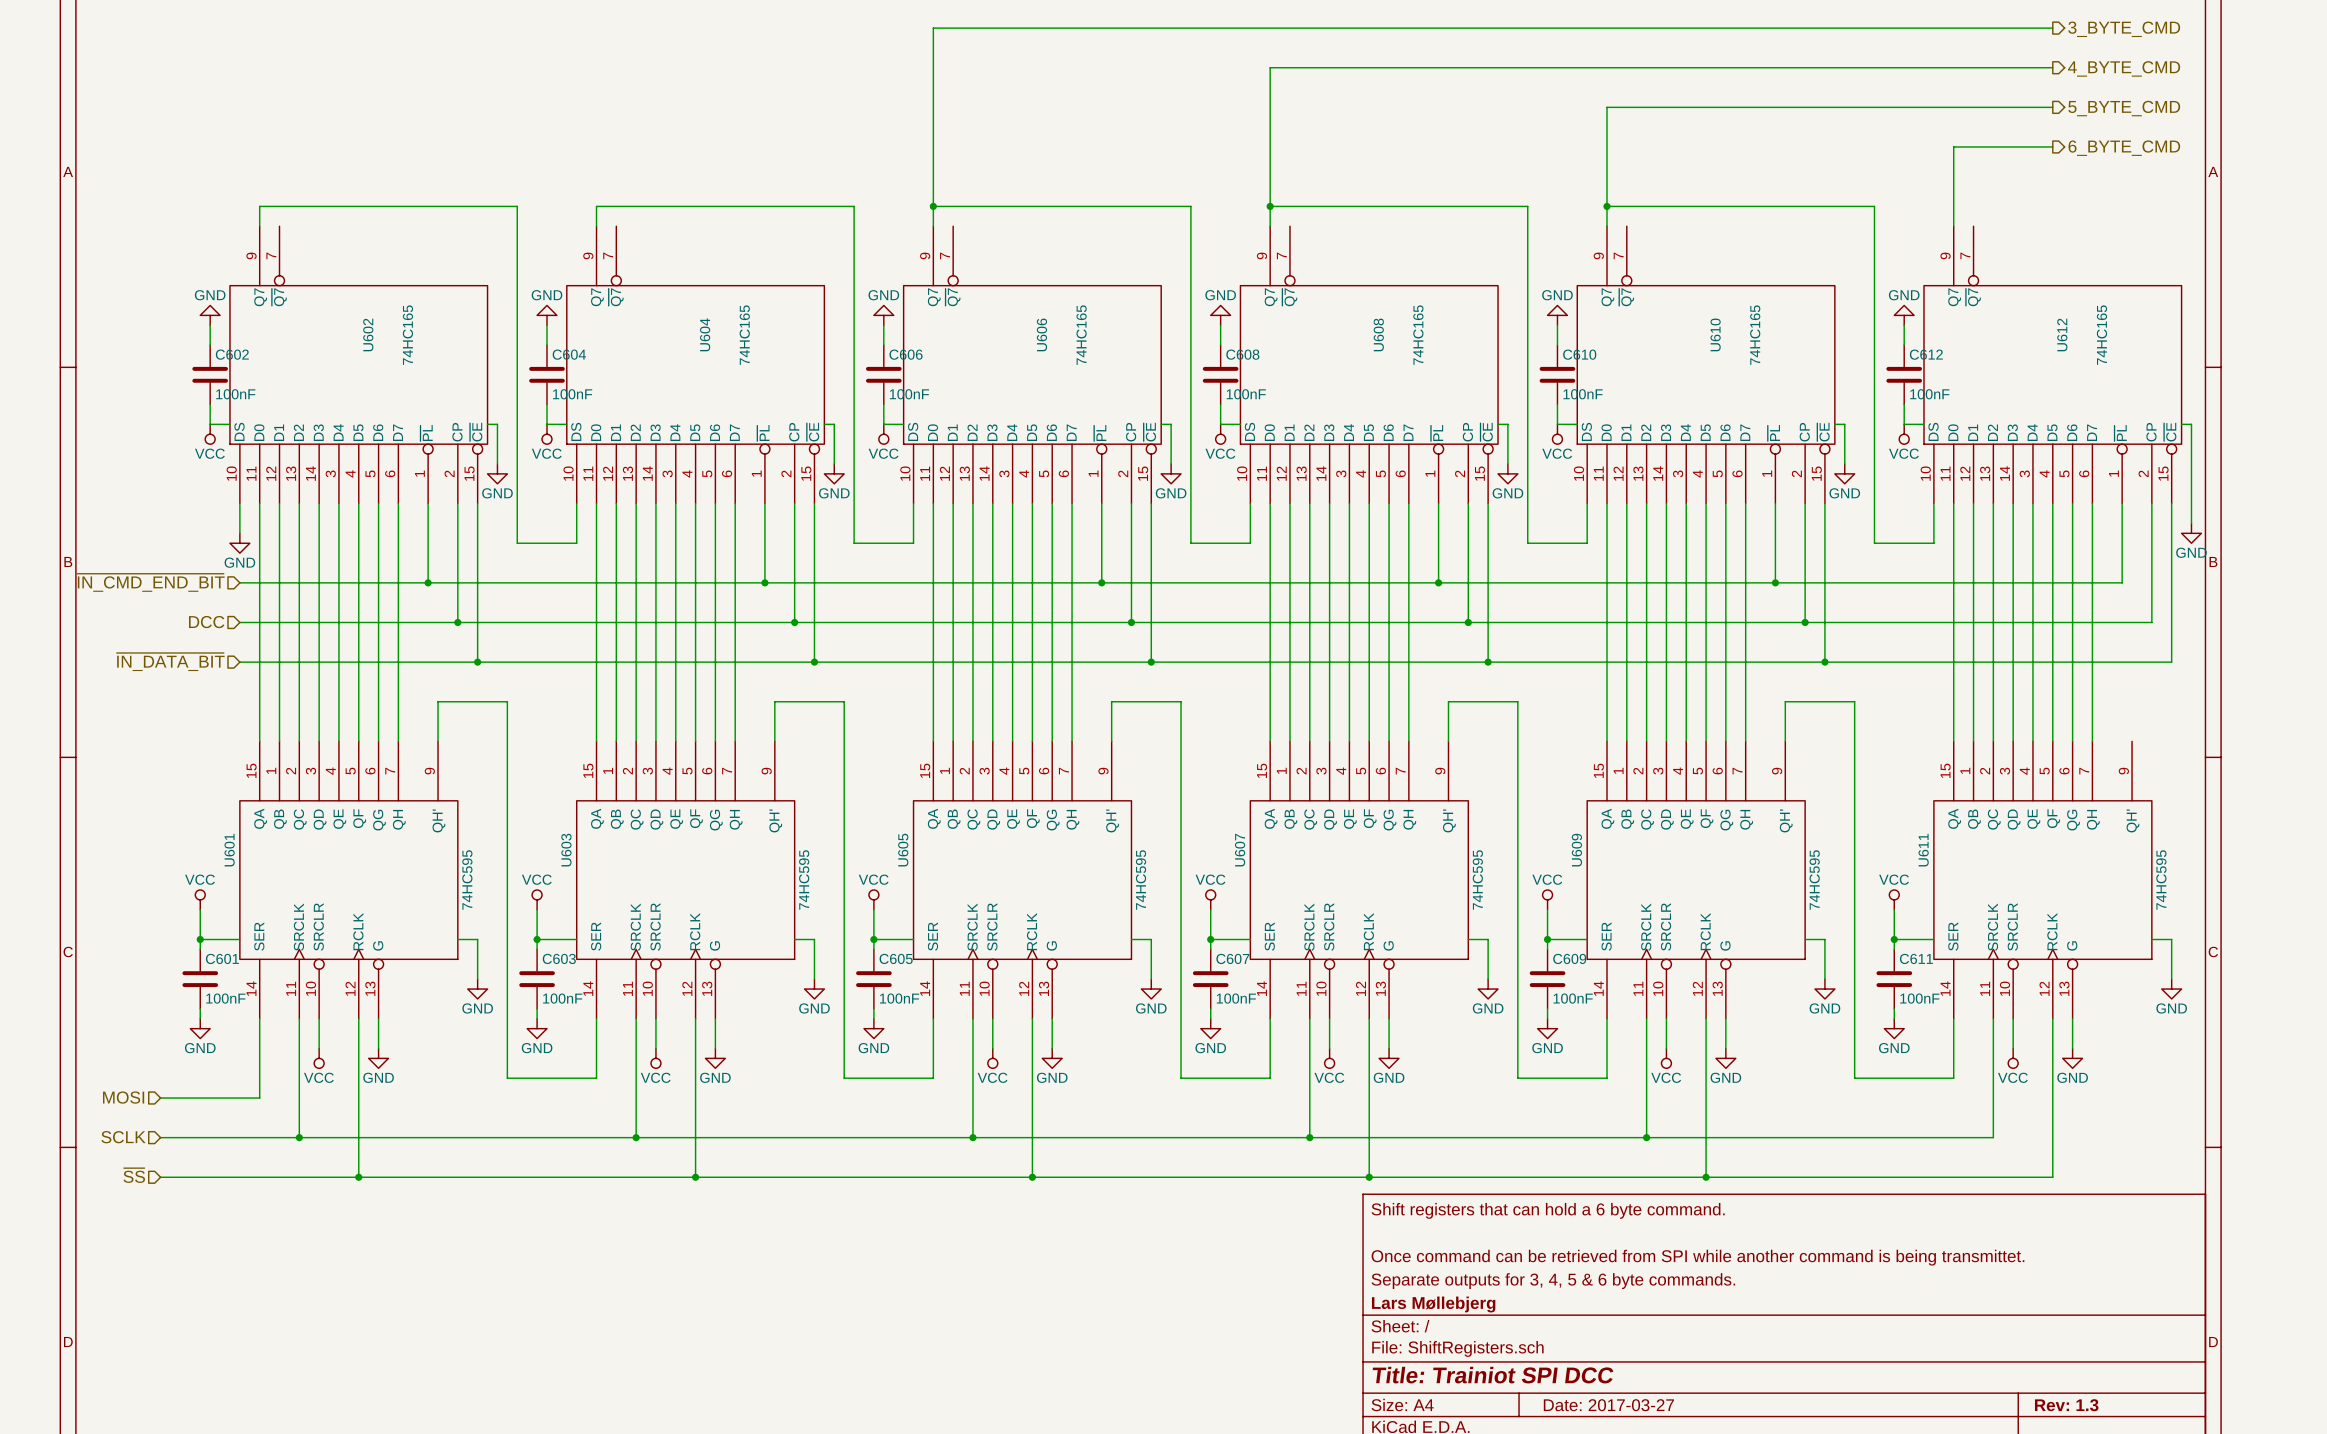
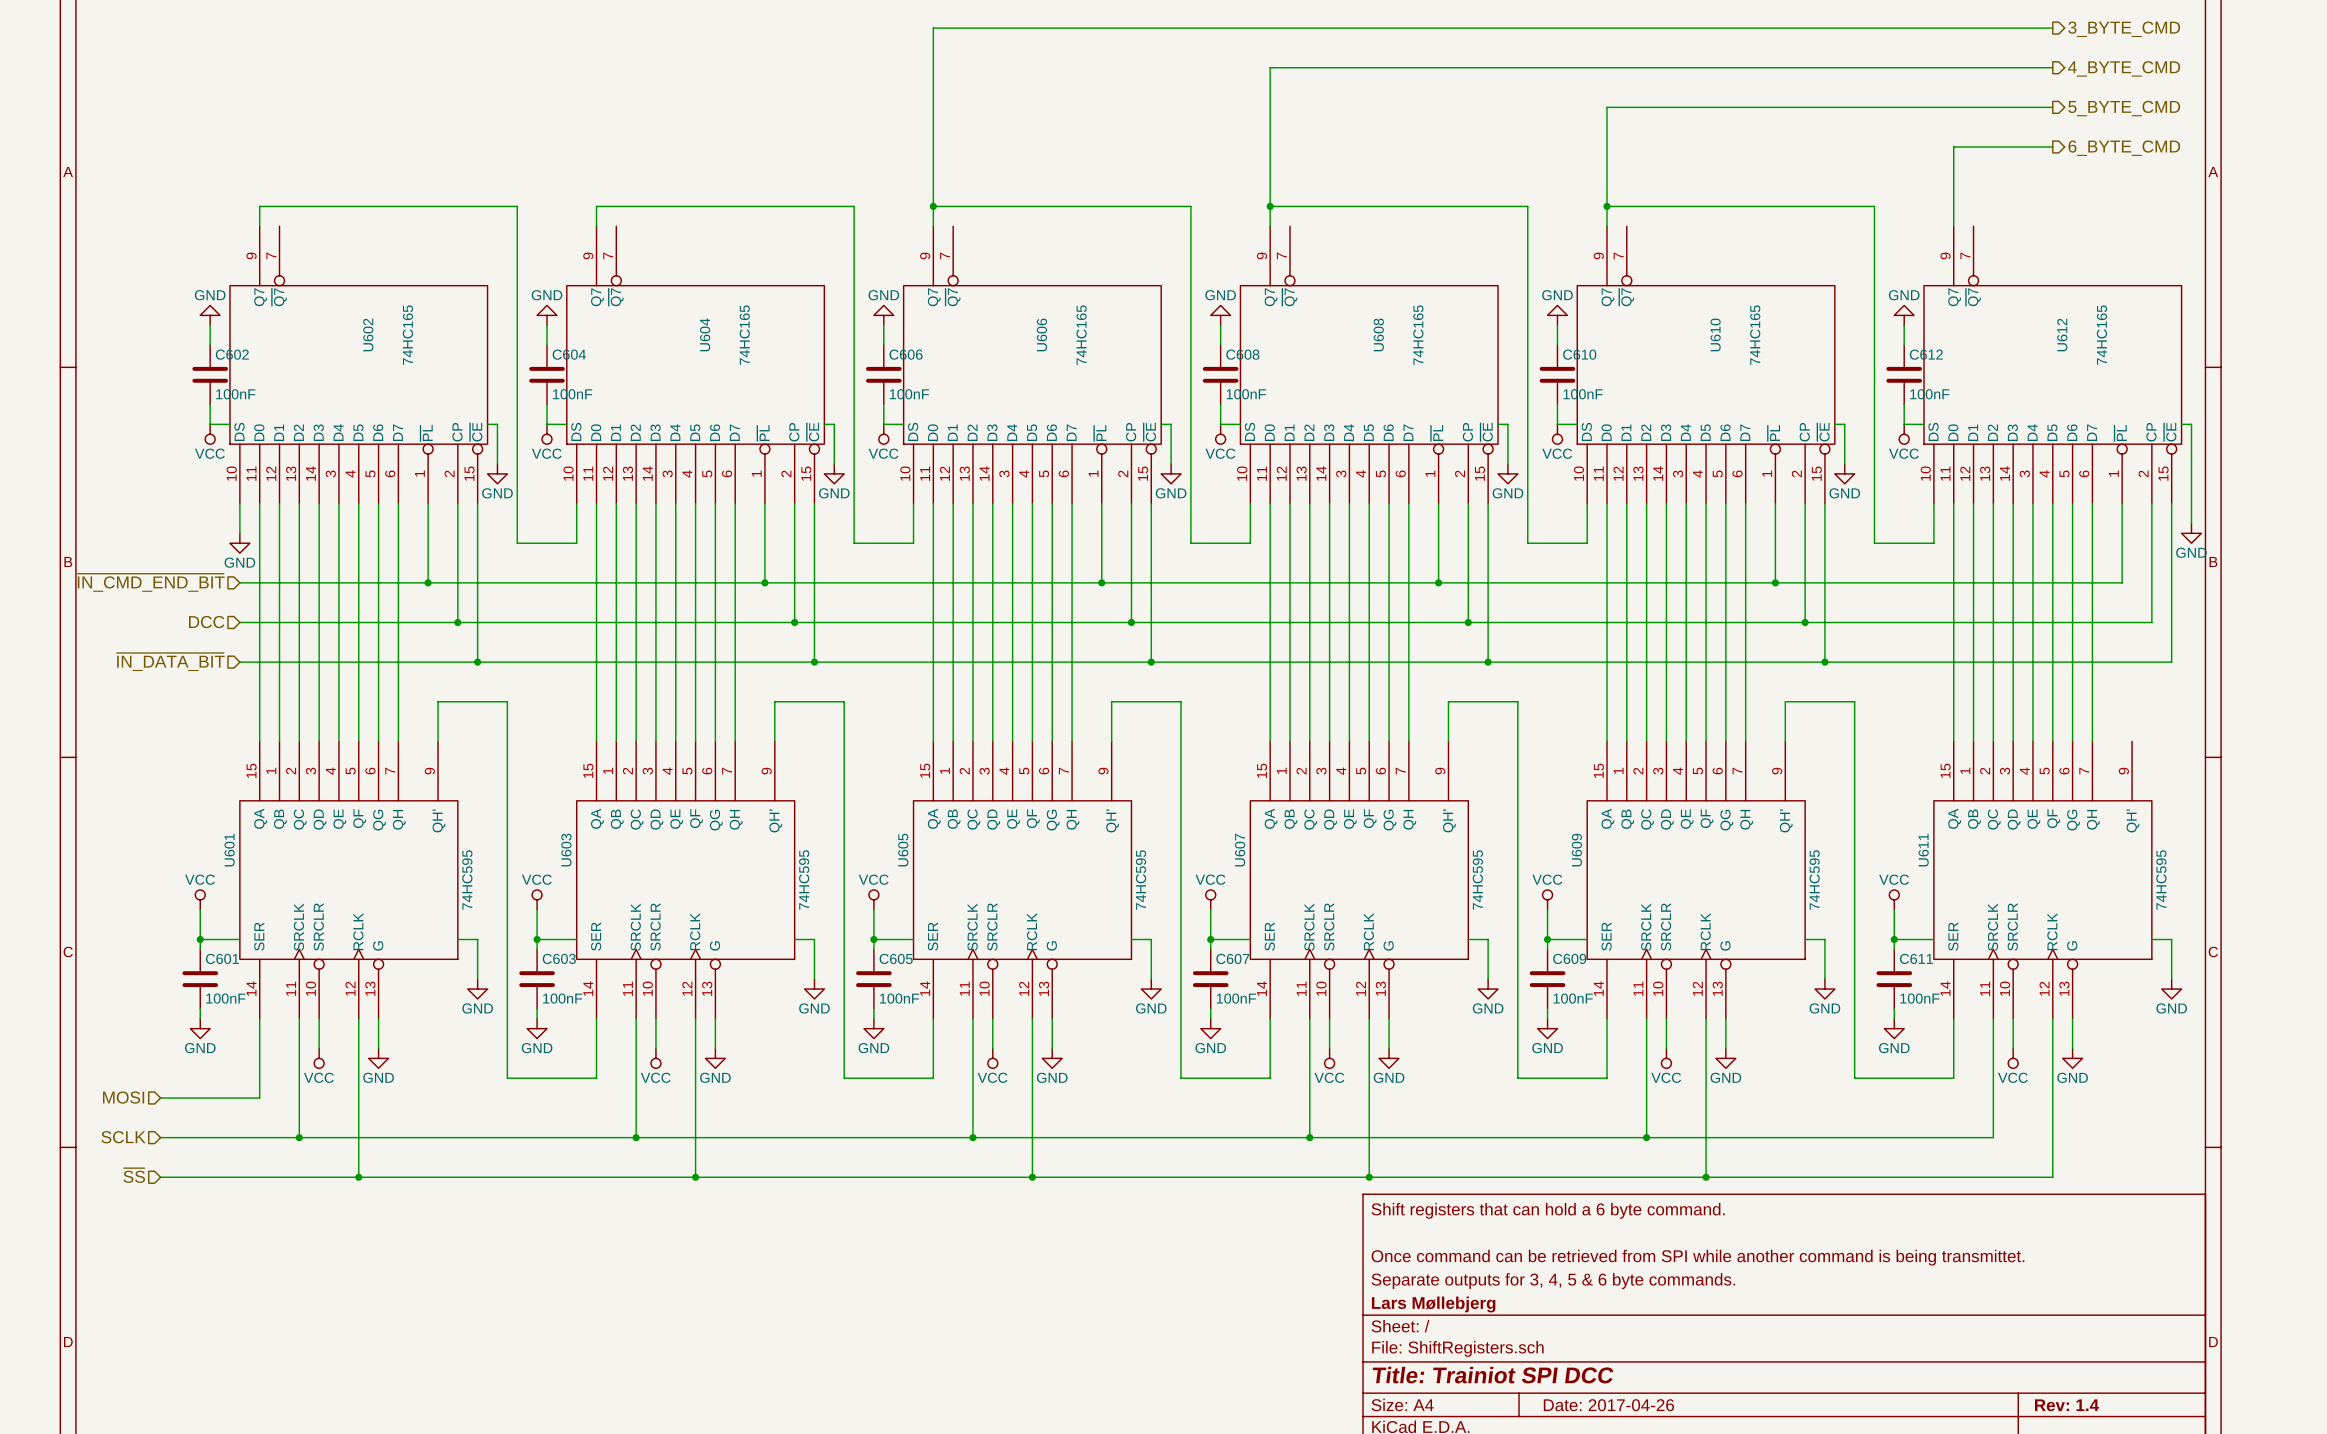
title block: Date: 2017-03-27 (1608, 1405) -> Date: 2017-04-26 (1608, 1405)
title block: Rev: 1.3 (2066, 1405) -> Rev: 1.4 (2066, 1405)

